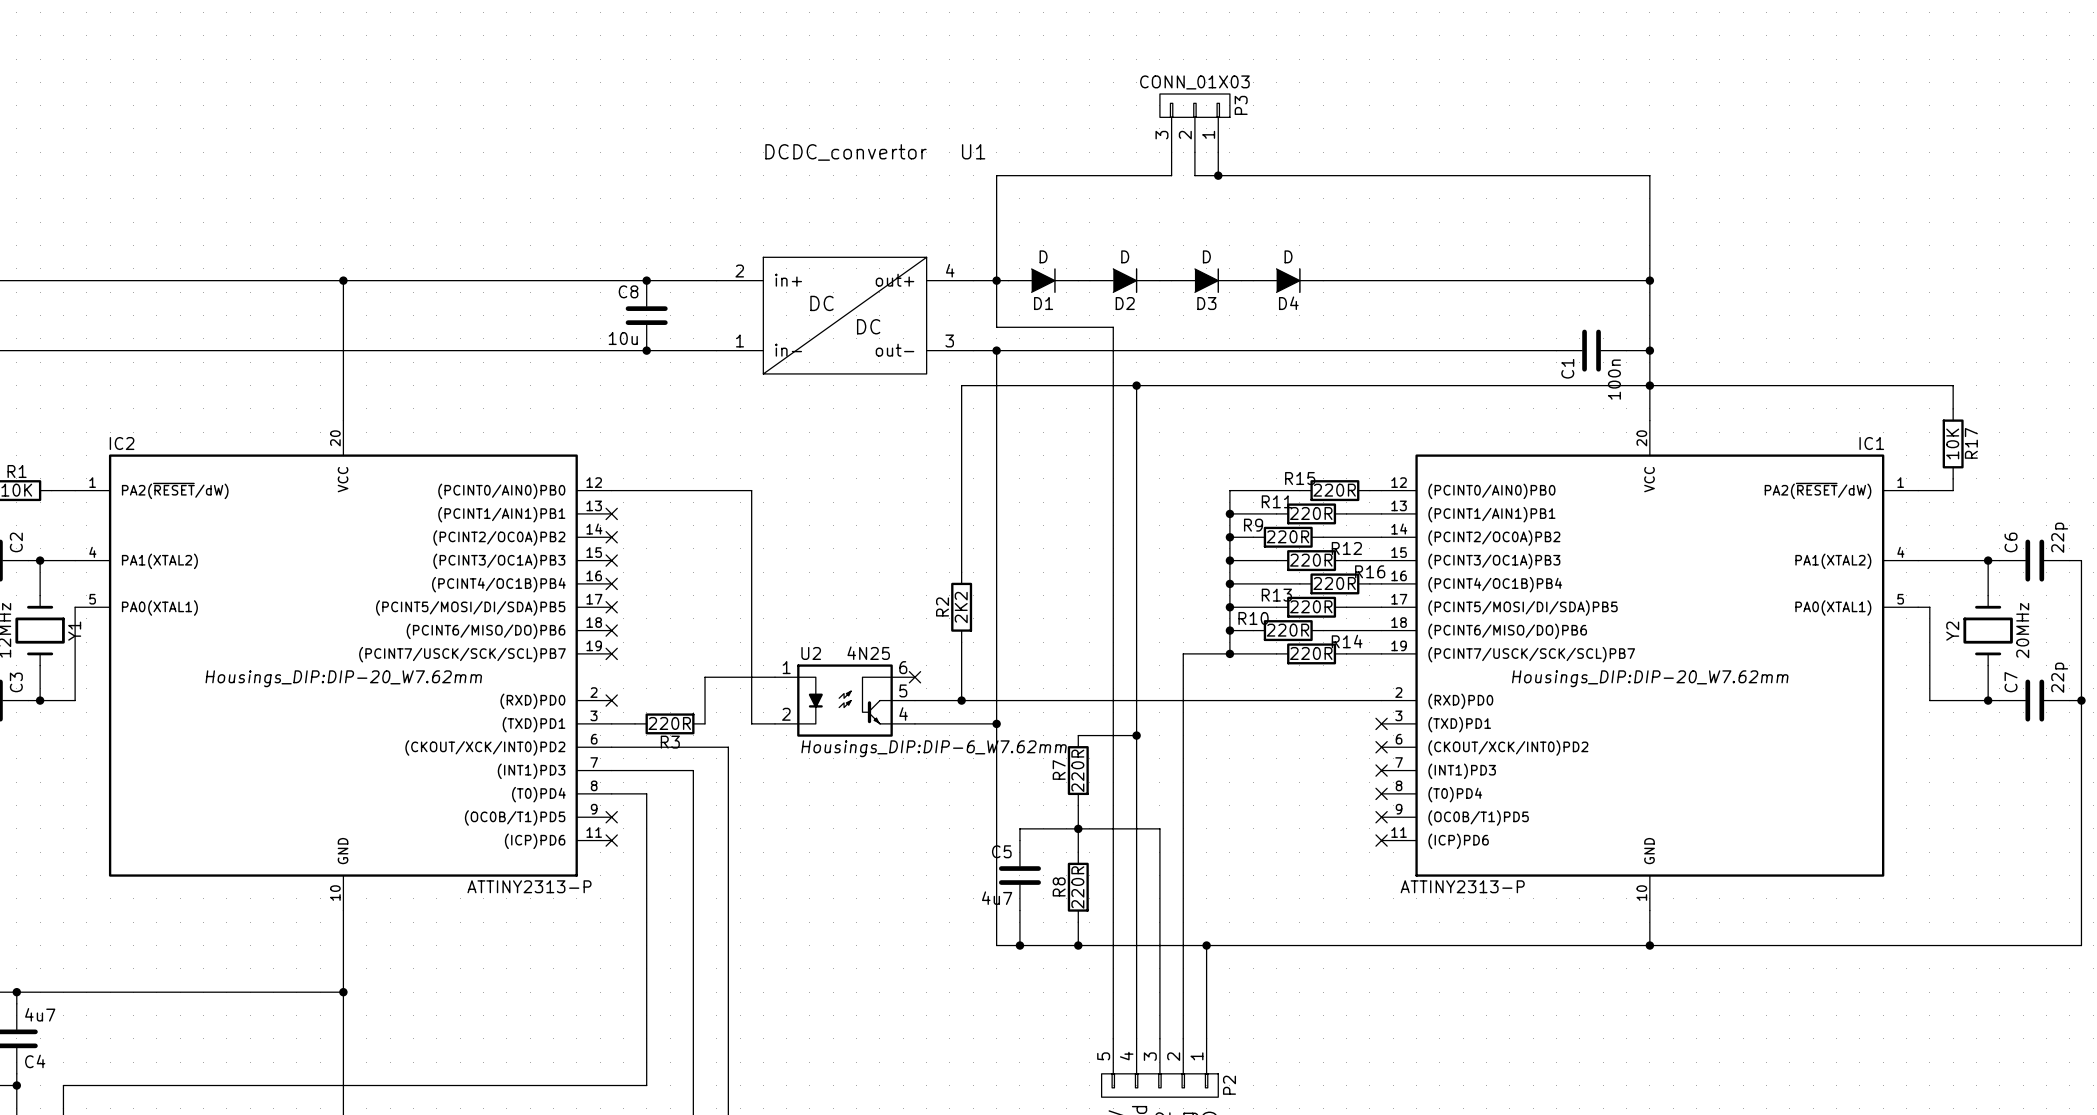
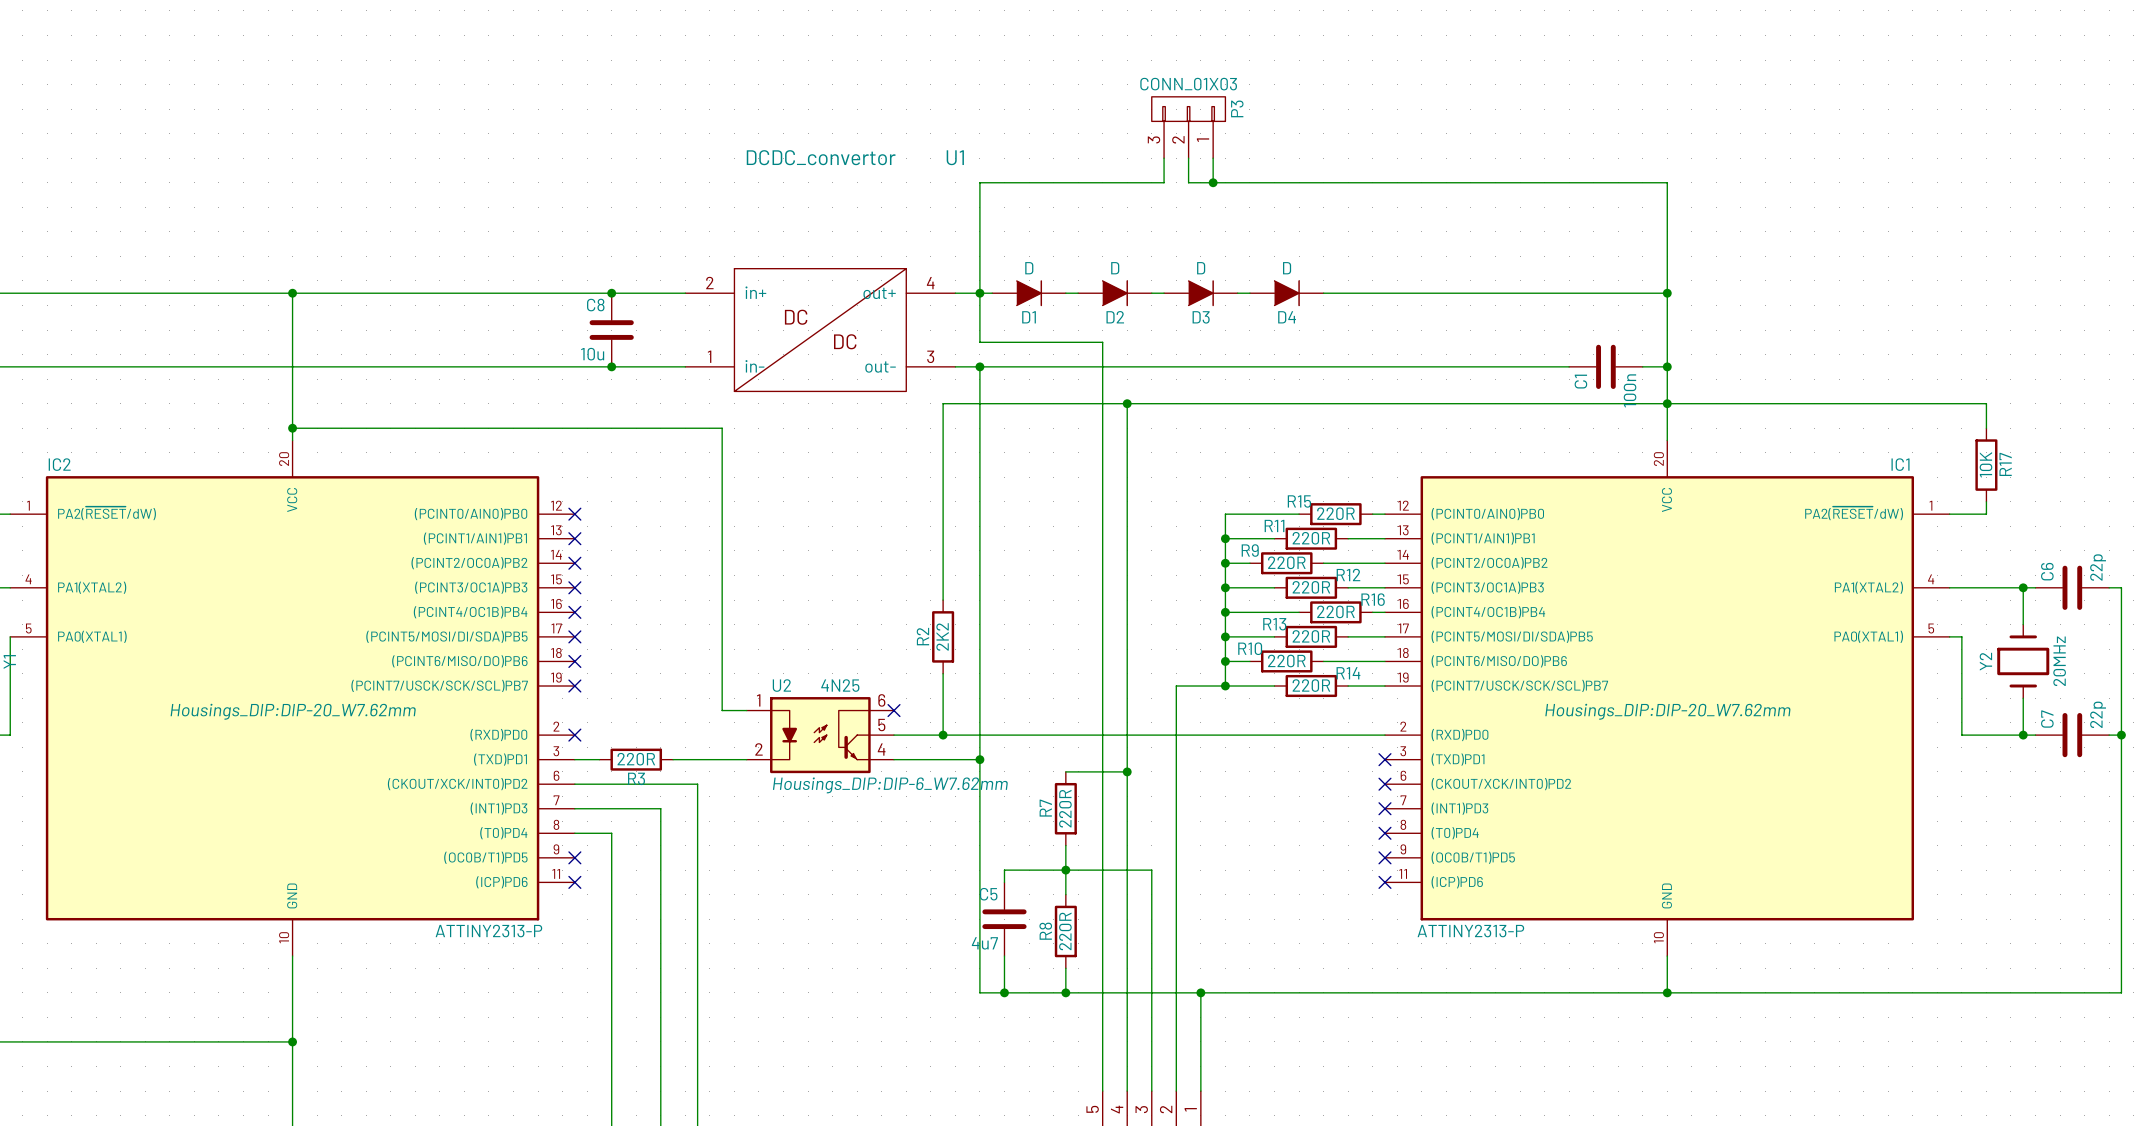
junction: none -> (292, 428)
wire: (611, 490) (751, 490) -> (292, 428) (722, 428) (722, 514)
no-connect mark: none -> (574, 514)
wire: (705, 723) (705, 677) (751, 677) (751, 723) -> (673, 759) (722, 759)

